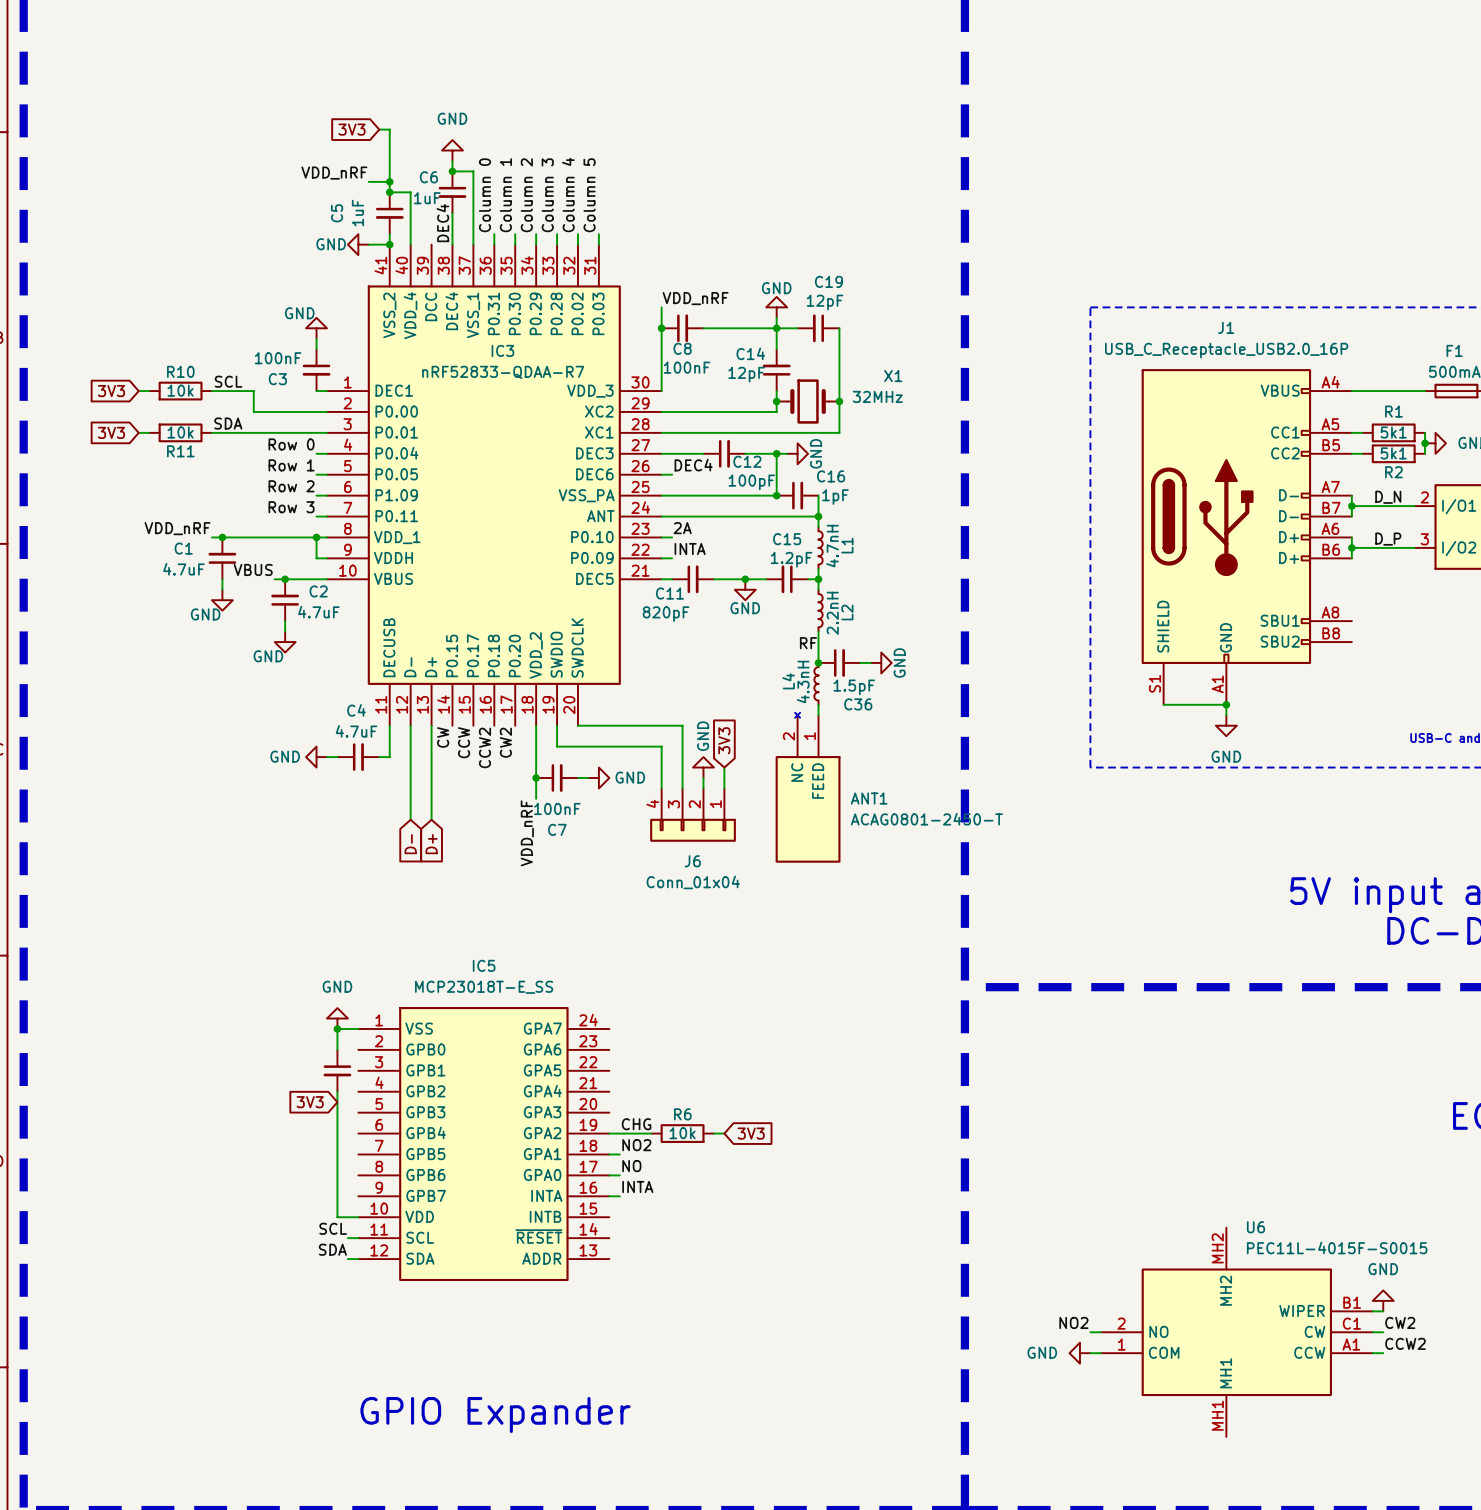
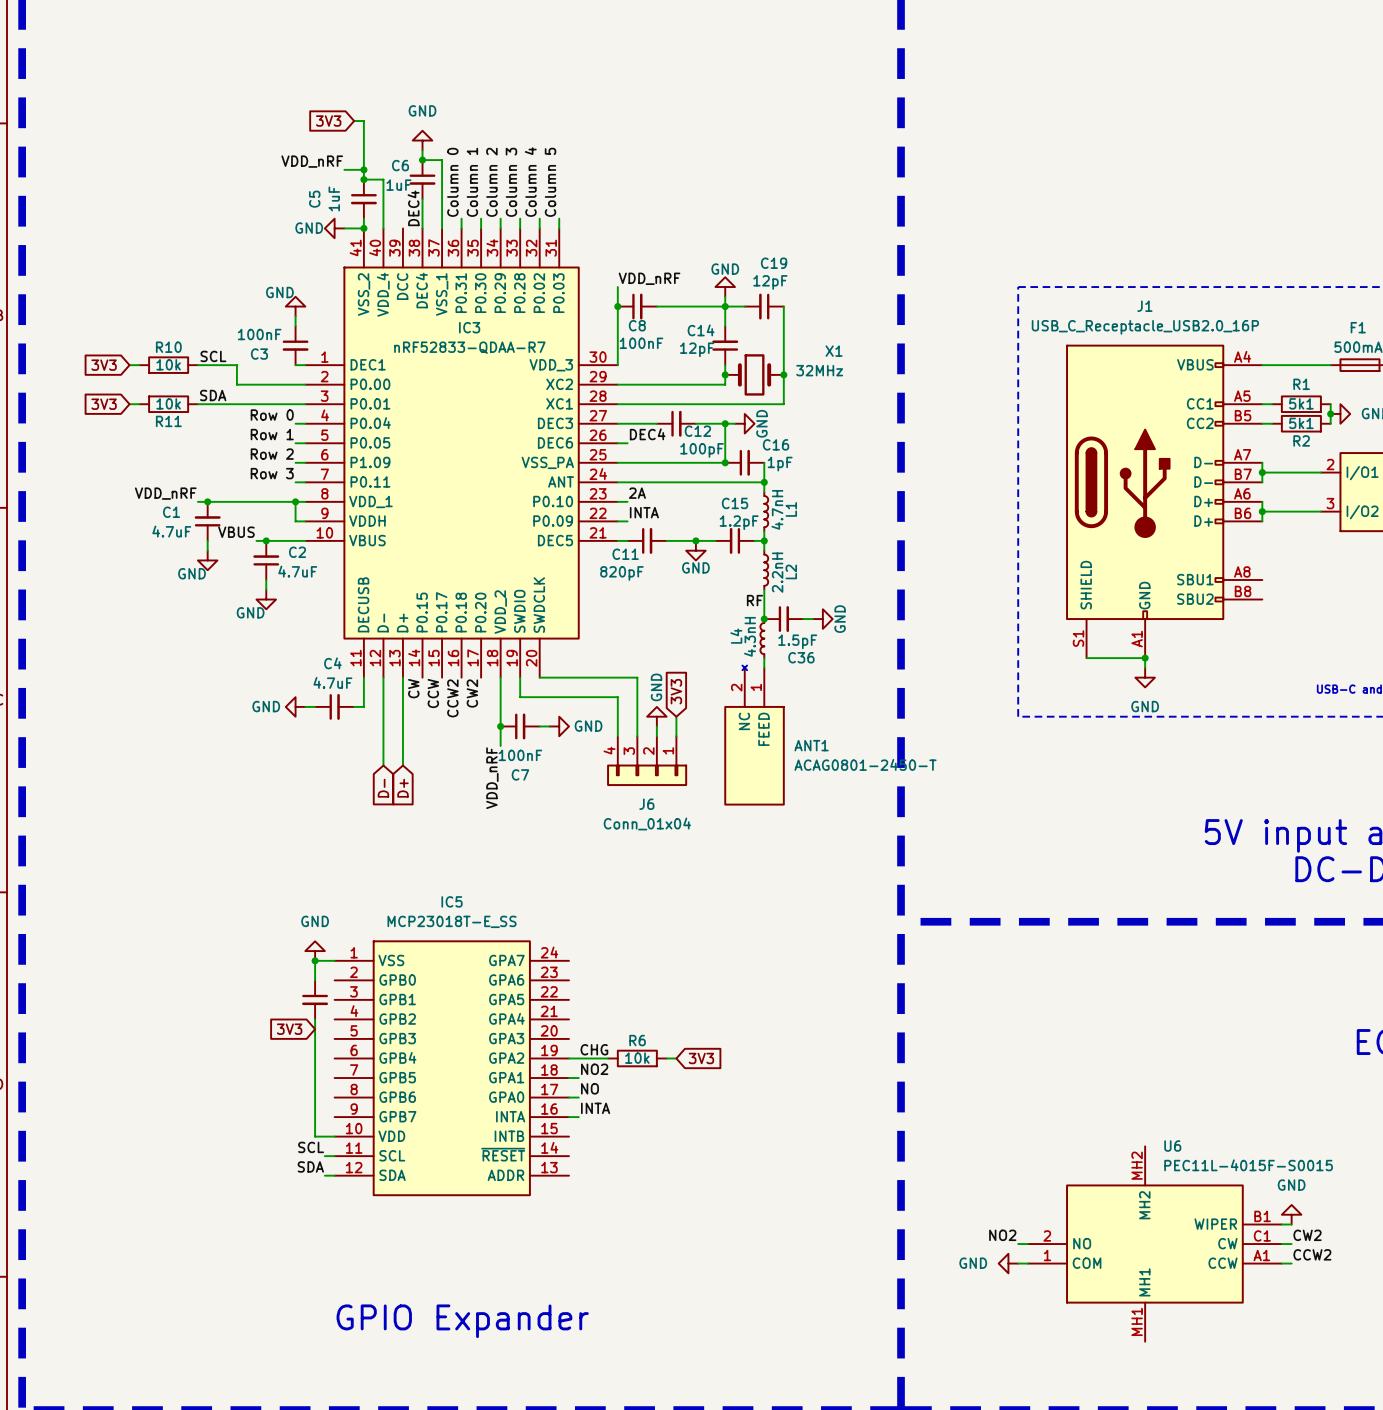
label: D_N (1388, 497) -> none
label: D_P (1388, 539) -> none

